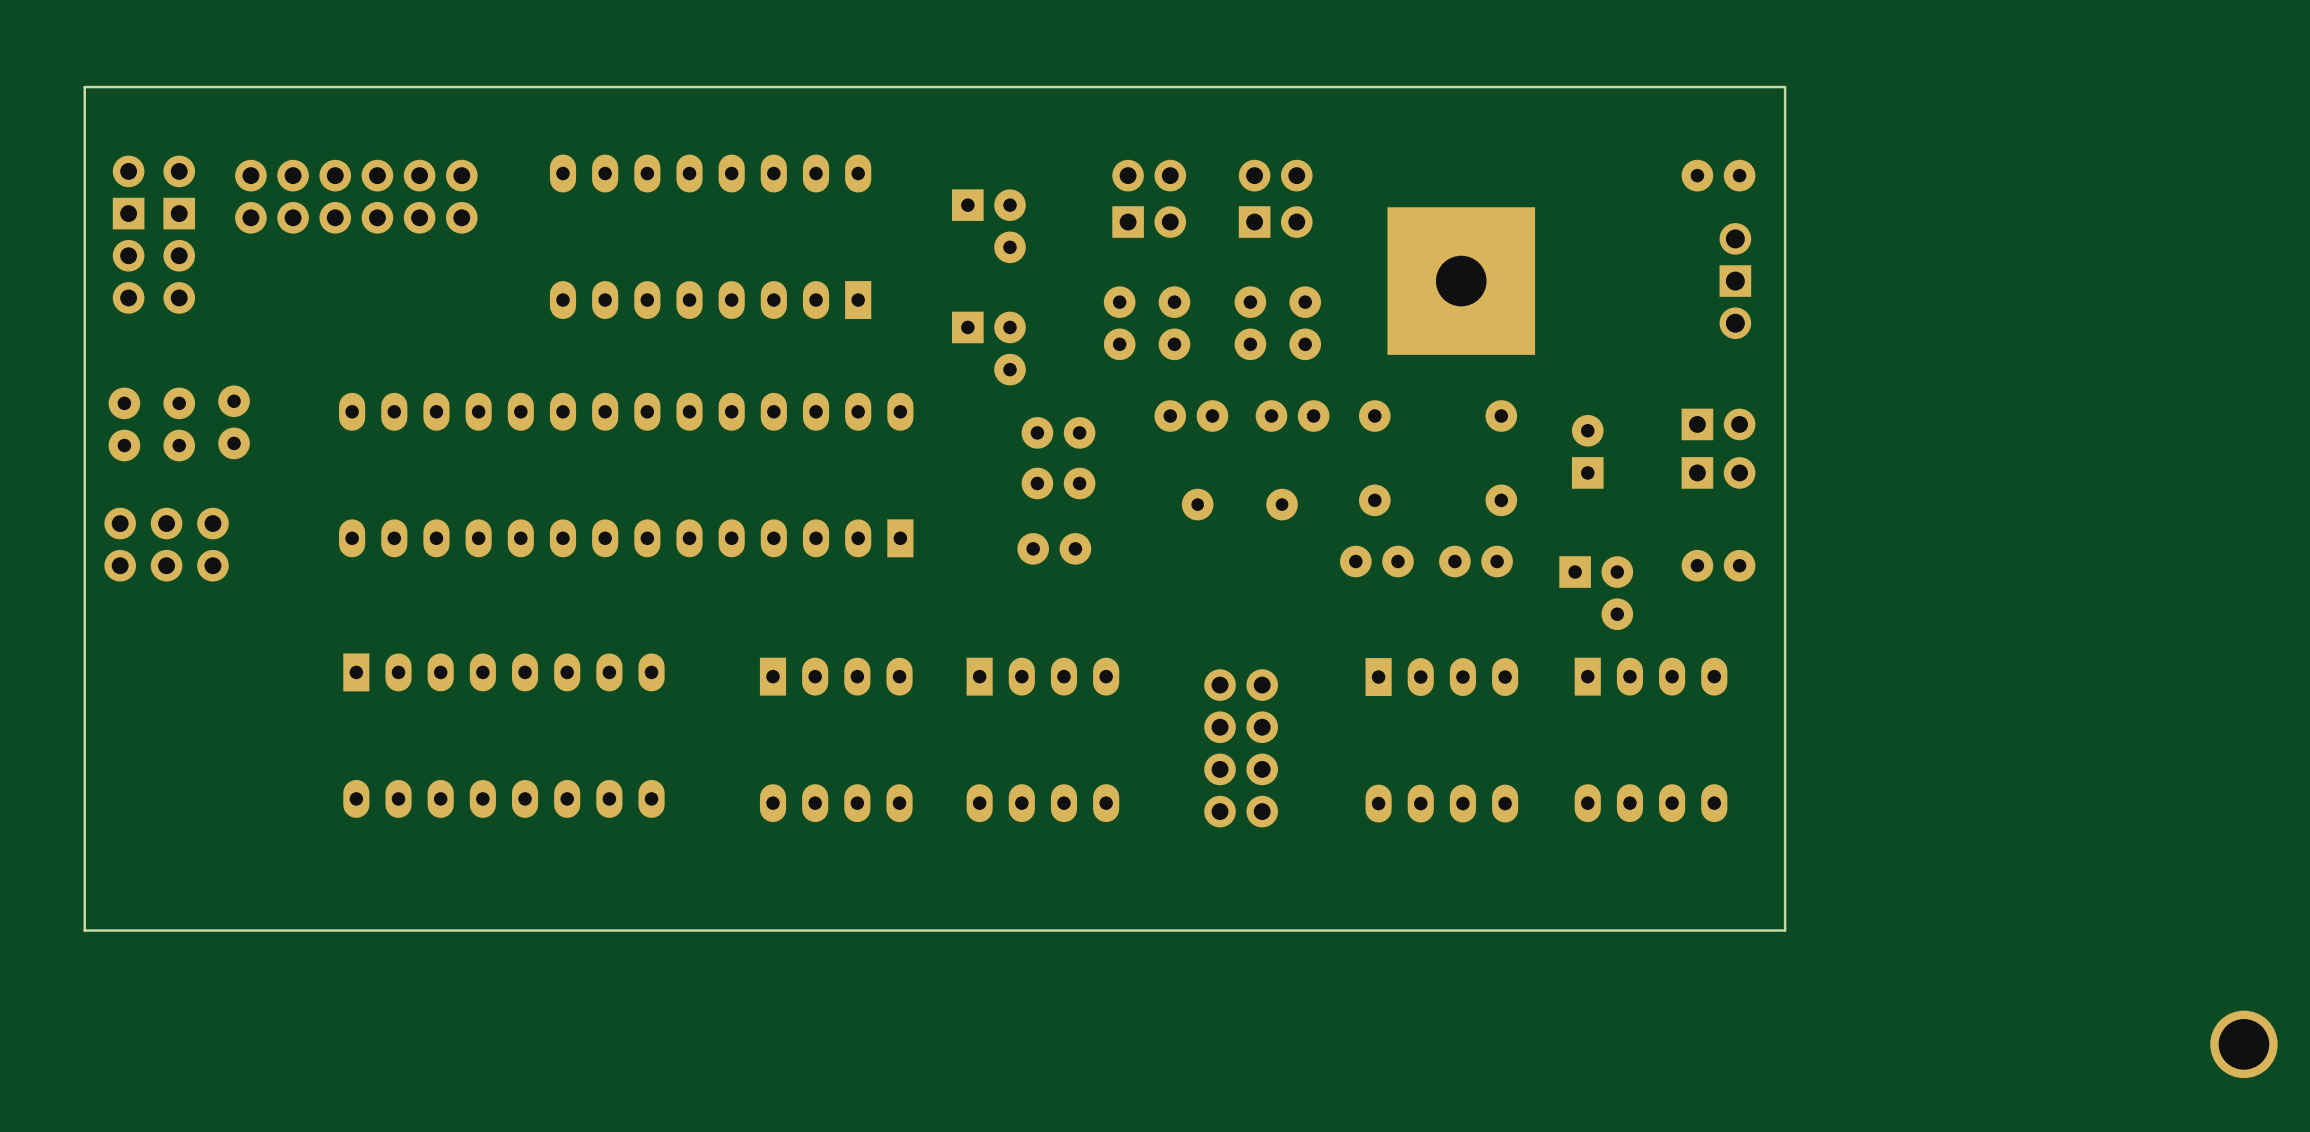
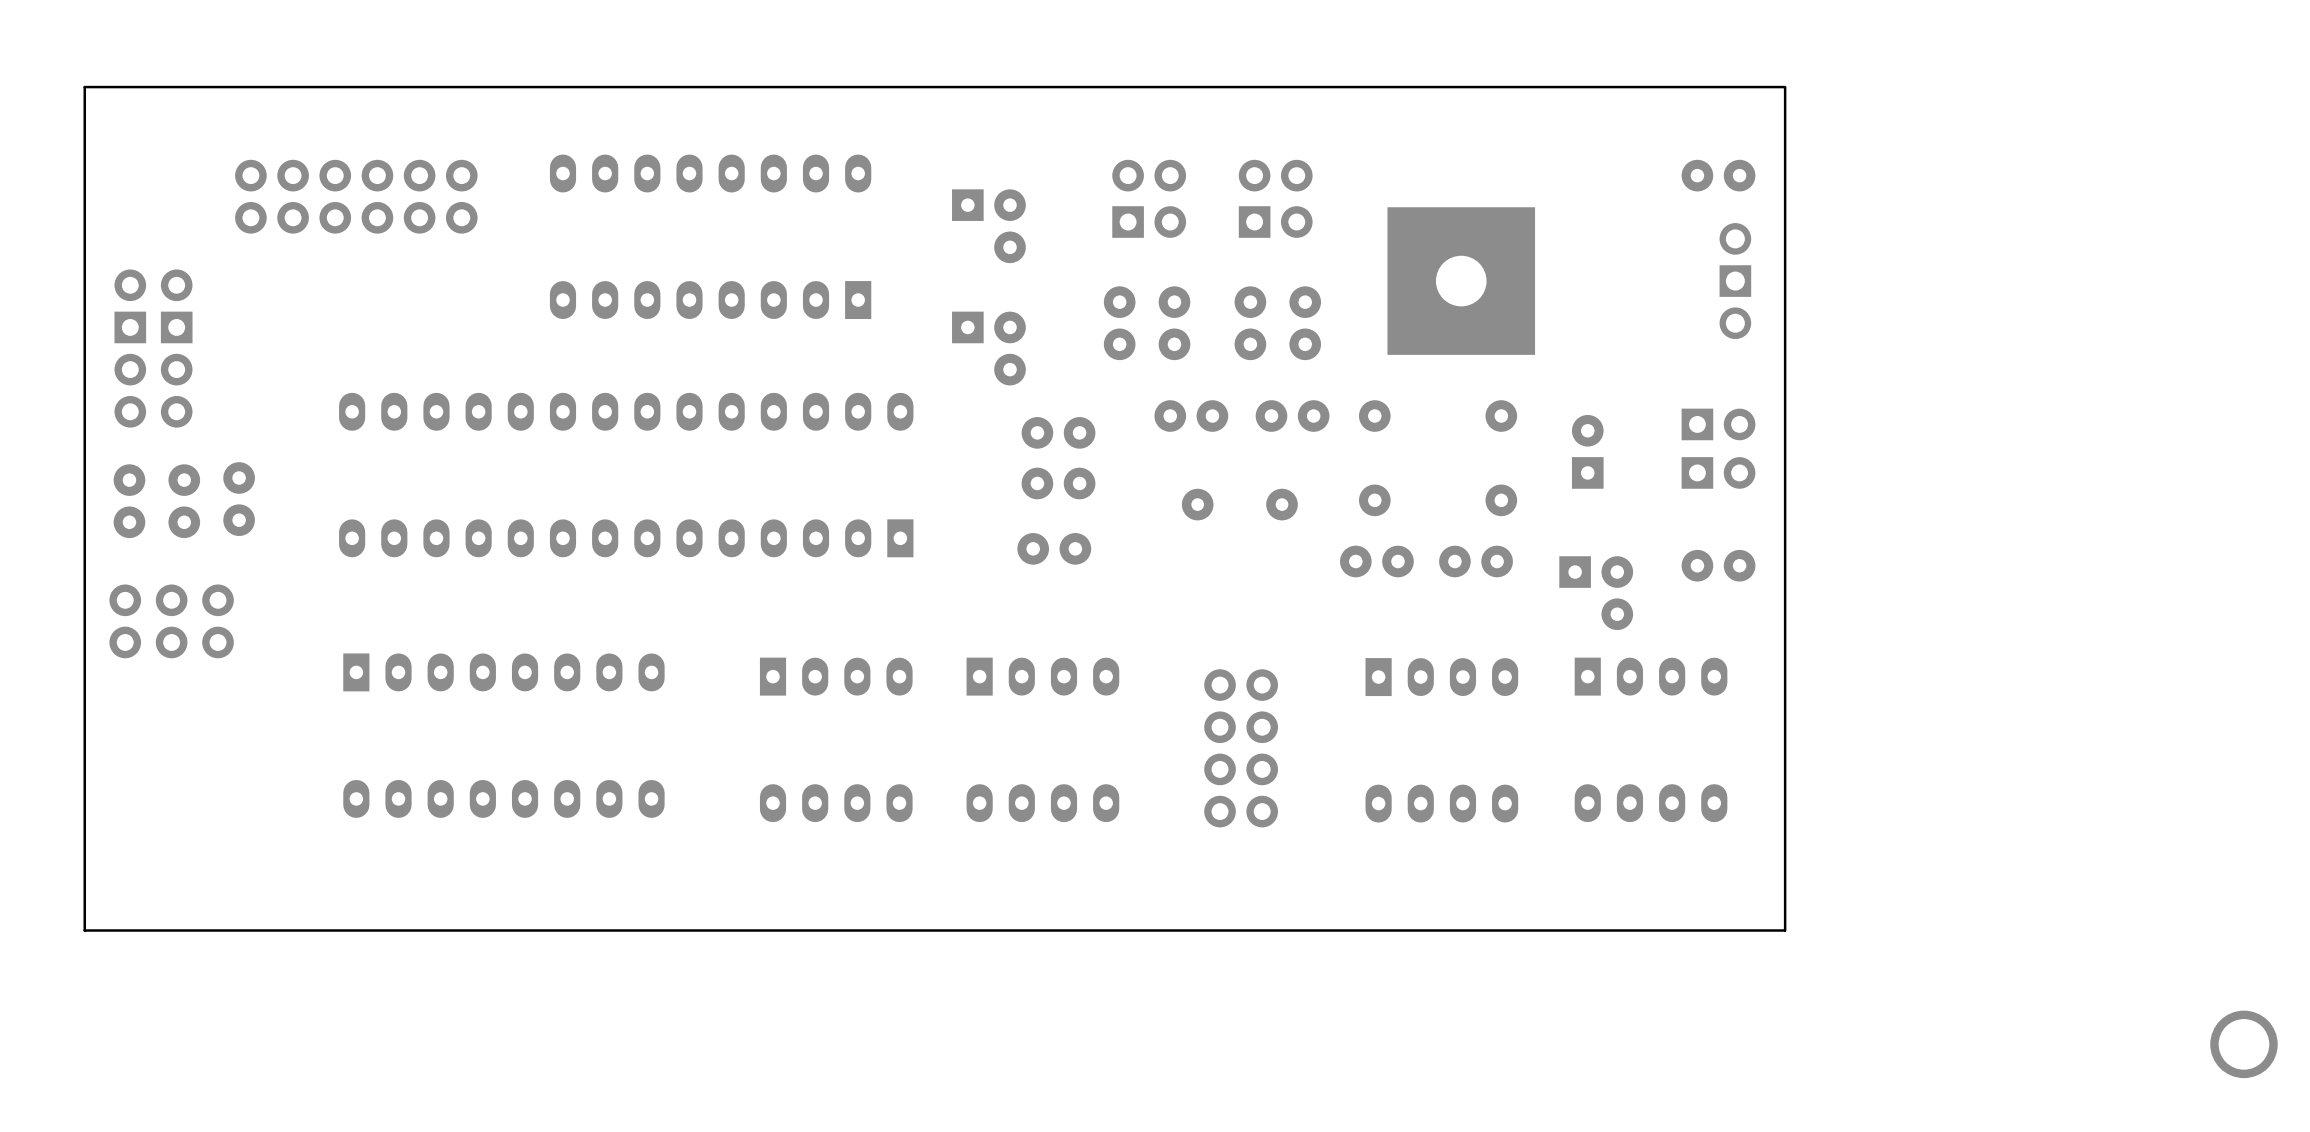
part: (128, 234) -> none
part: (179, 234) -> none
part: none -> (130, 348)
part: none -> (176, 348)
part: (234, 422) -> none
part: (124, 424) -> none
part: (179, 424) -> none
part: none -> (239, 499)
part: none -> (129, 501)
part: none -> (184, 501)
part: (120, 544) -> none
part: (166, 544) -> none
part: (212, 544) -> none
part: none -> (125, 621)
part: none -> (171, 621)
part: none -> (218, 621)

